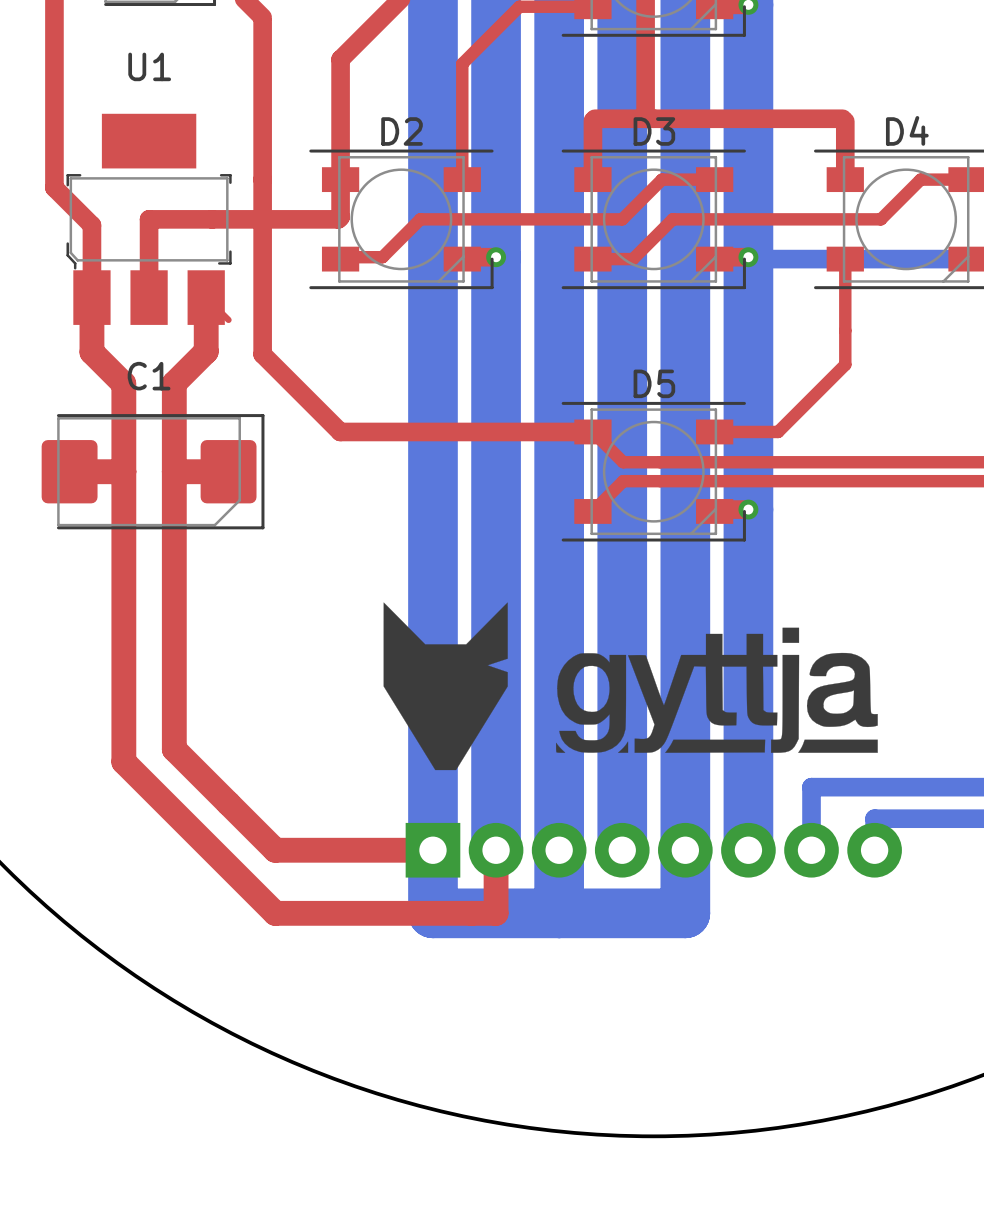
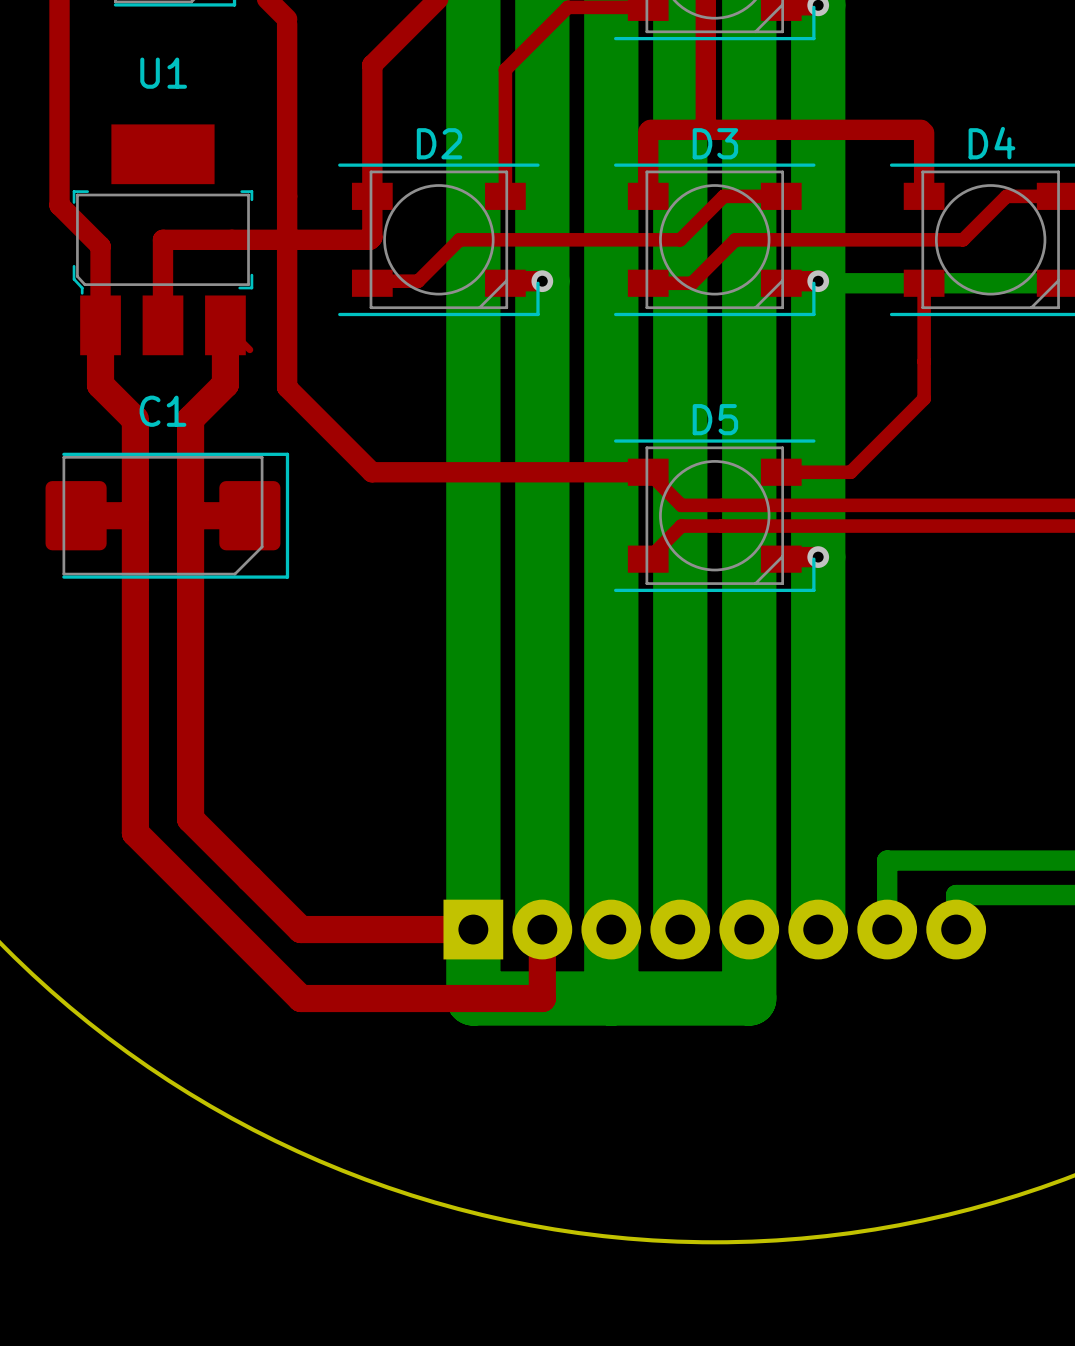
drawing: [383, 602, 508, 771] -> none
drawing: [556, 627, 878, 753] -> none

